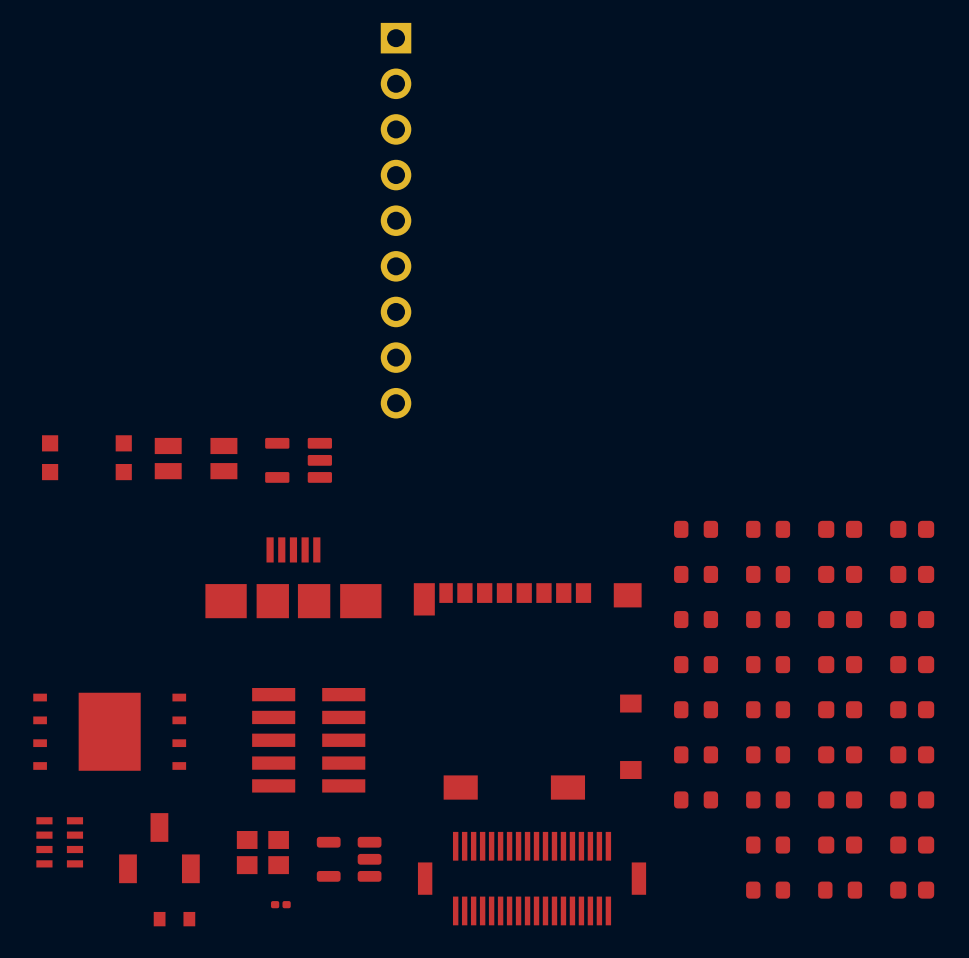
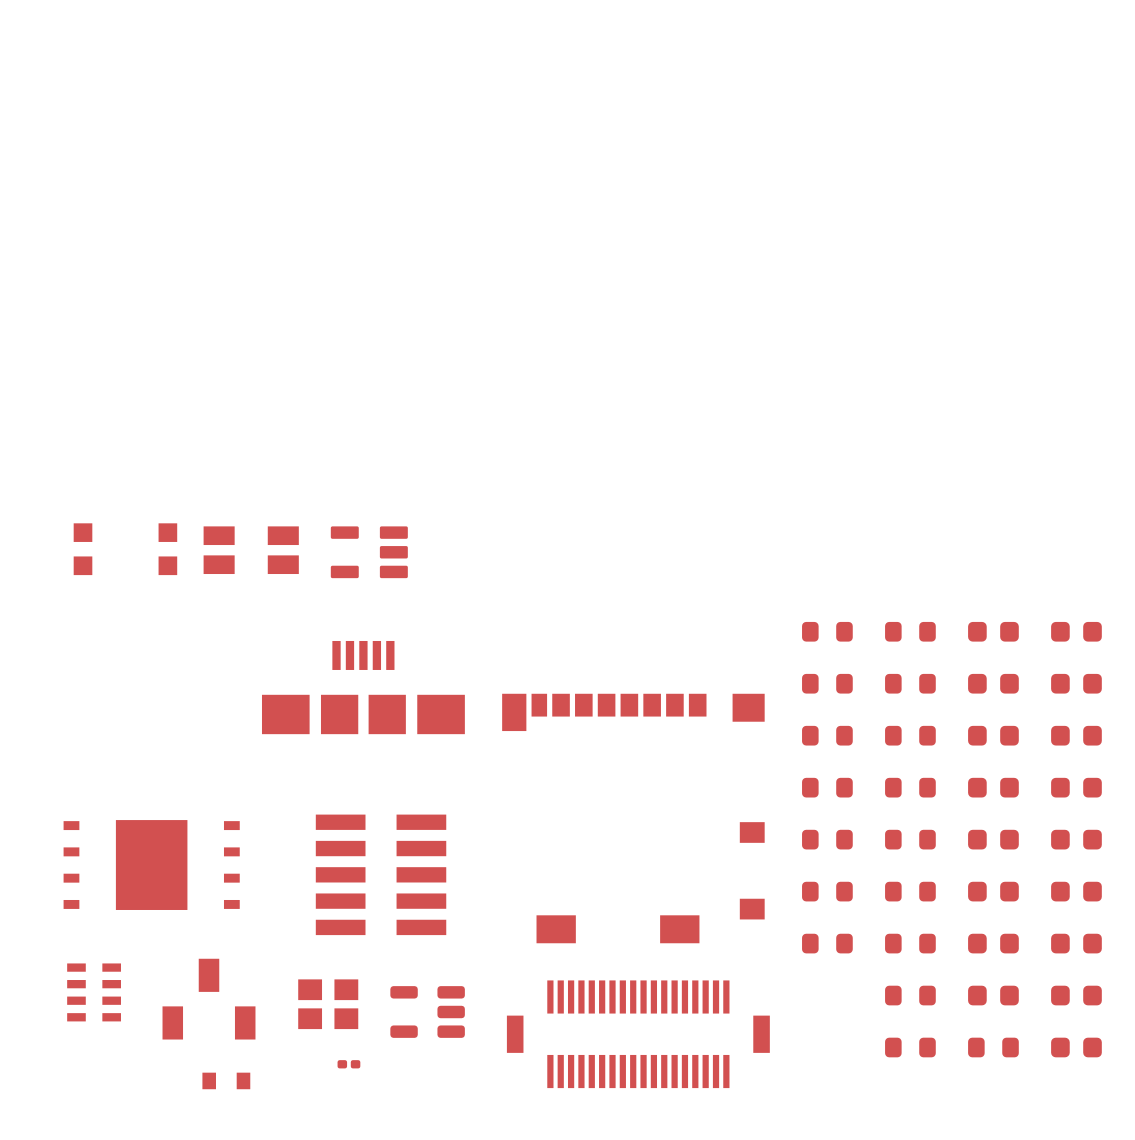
part: (396, 220) -> none

